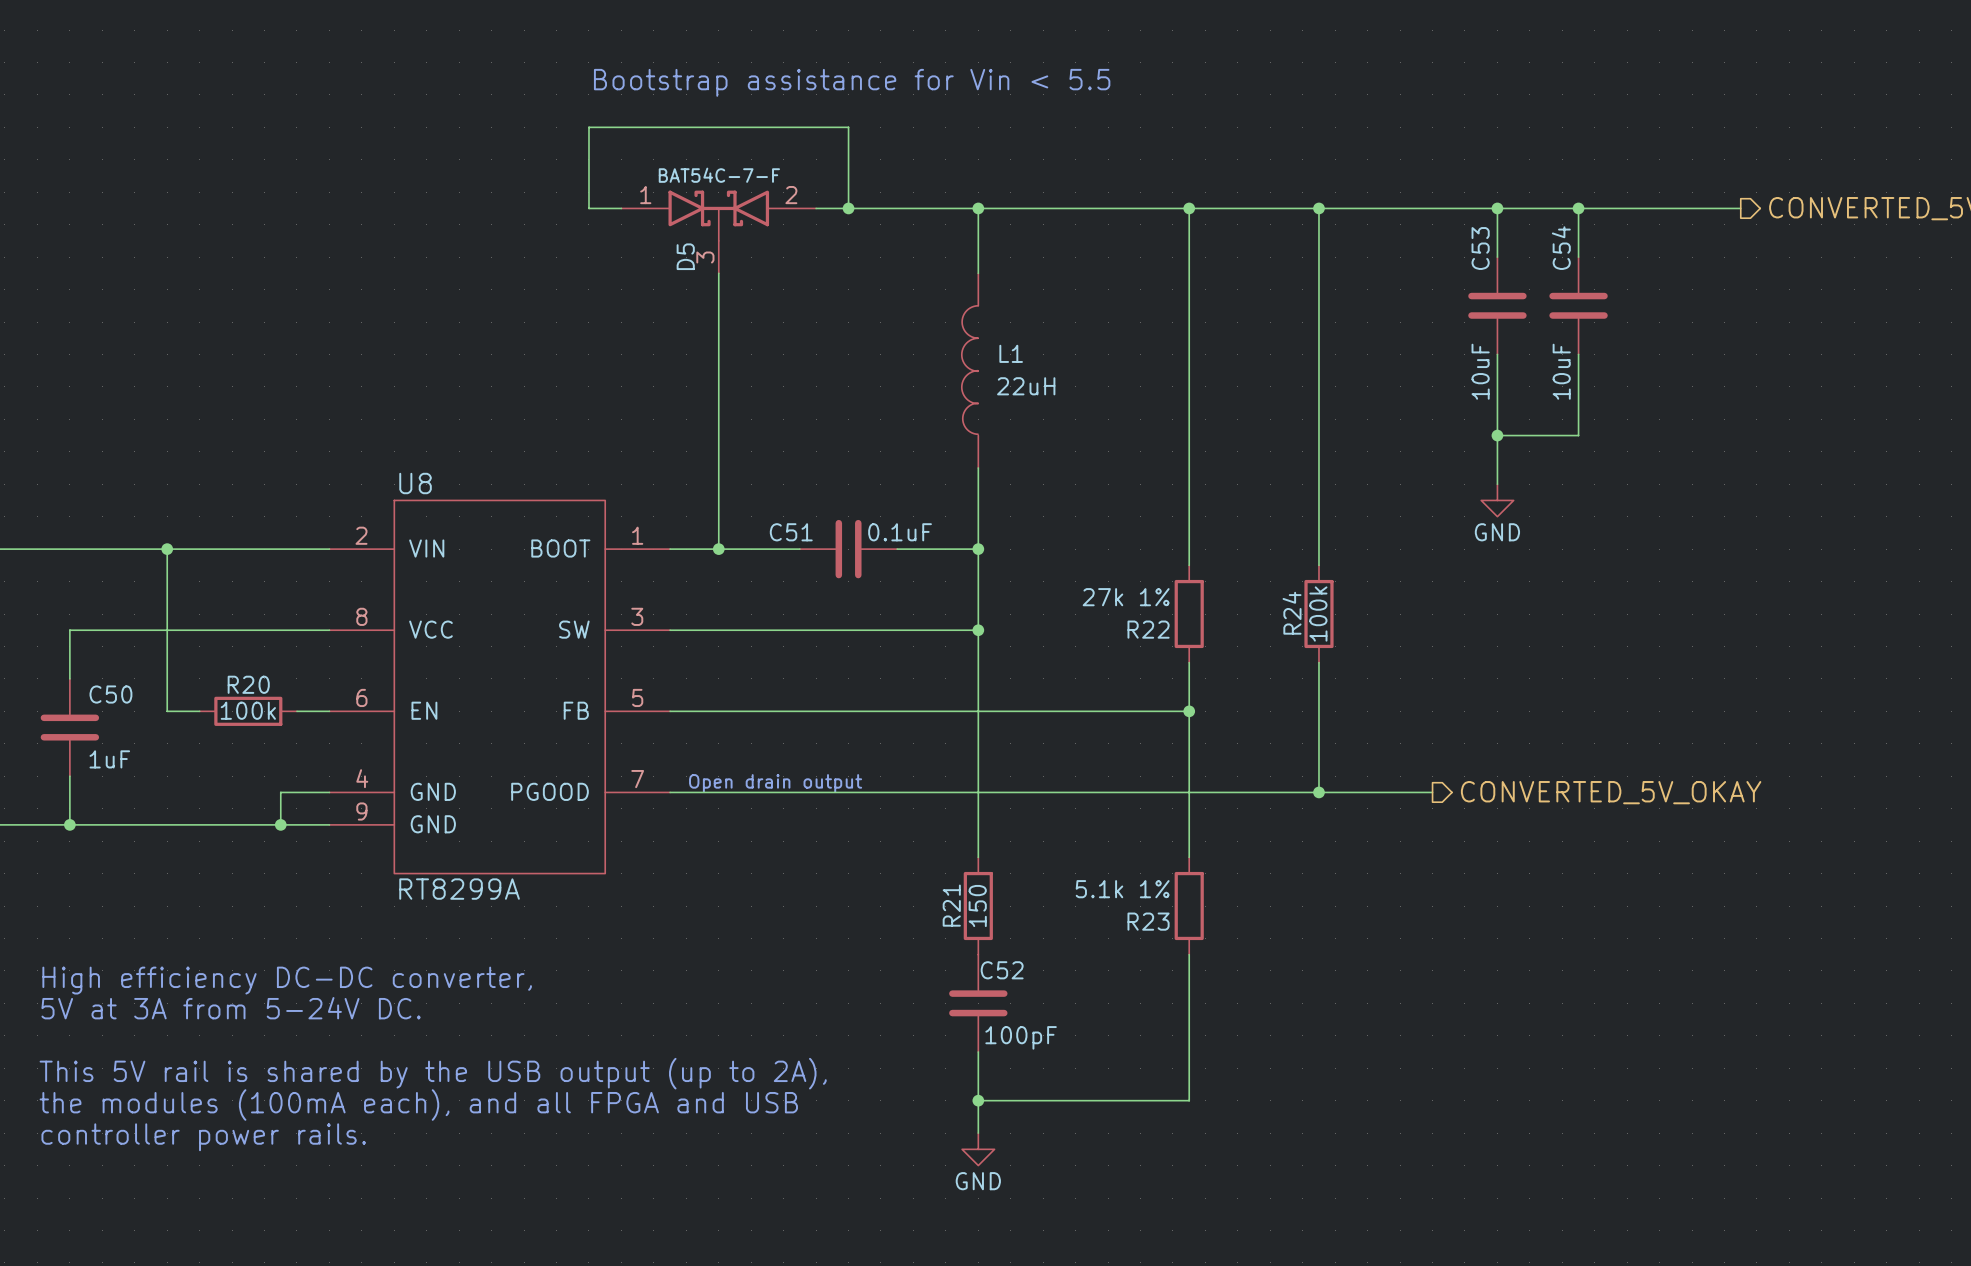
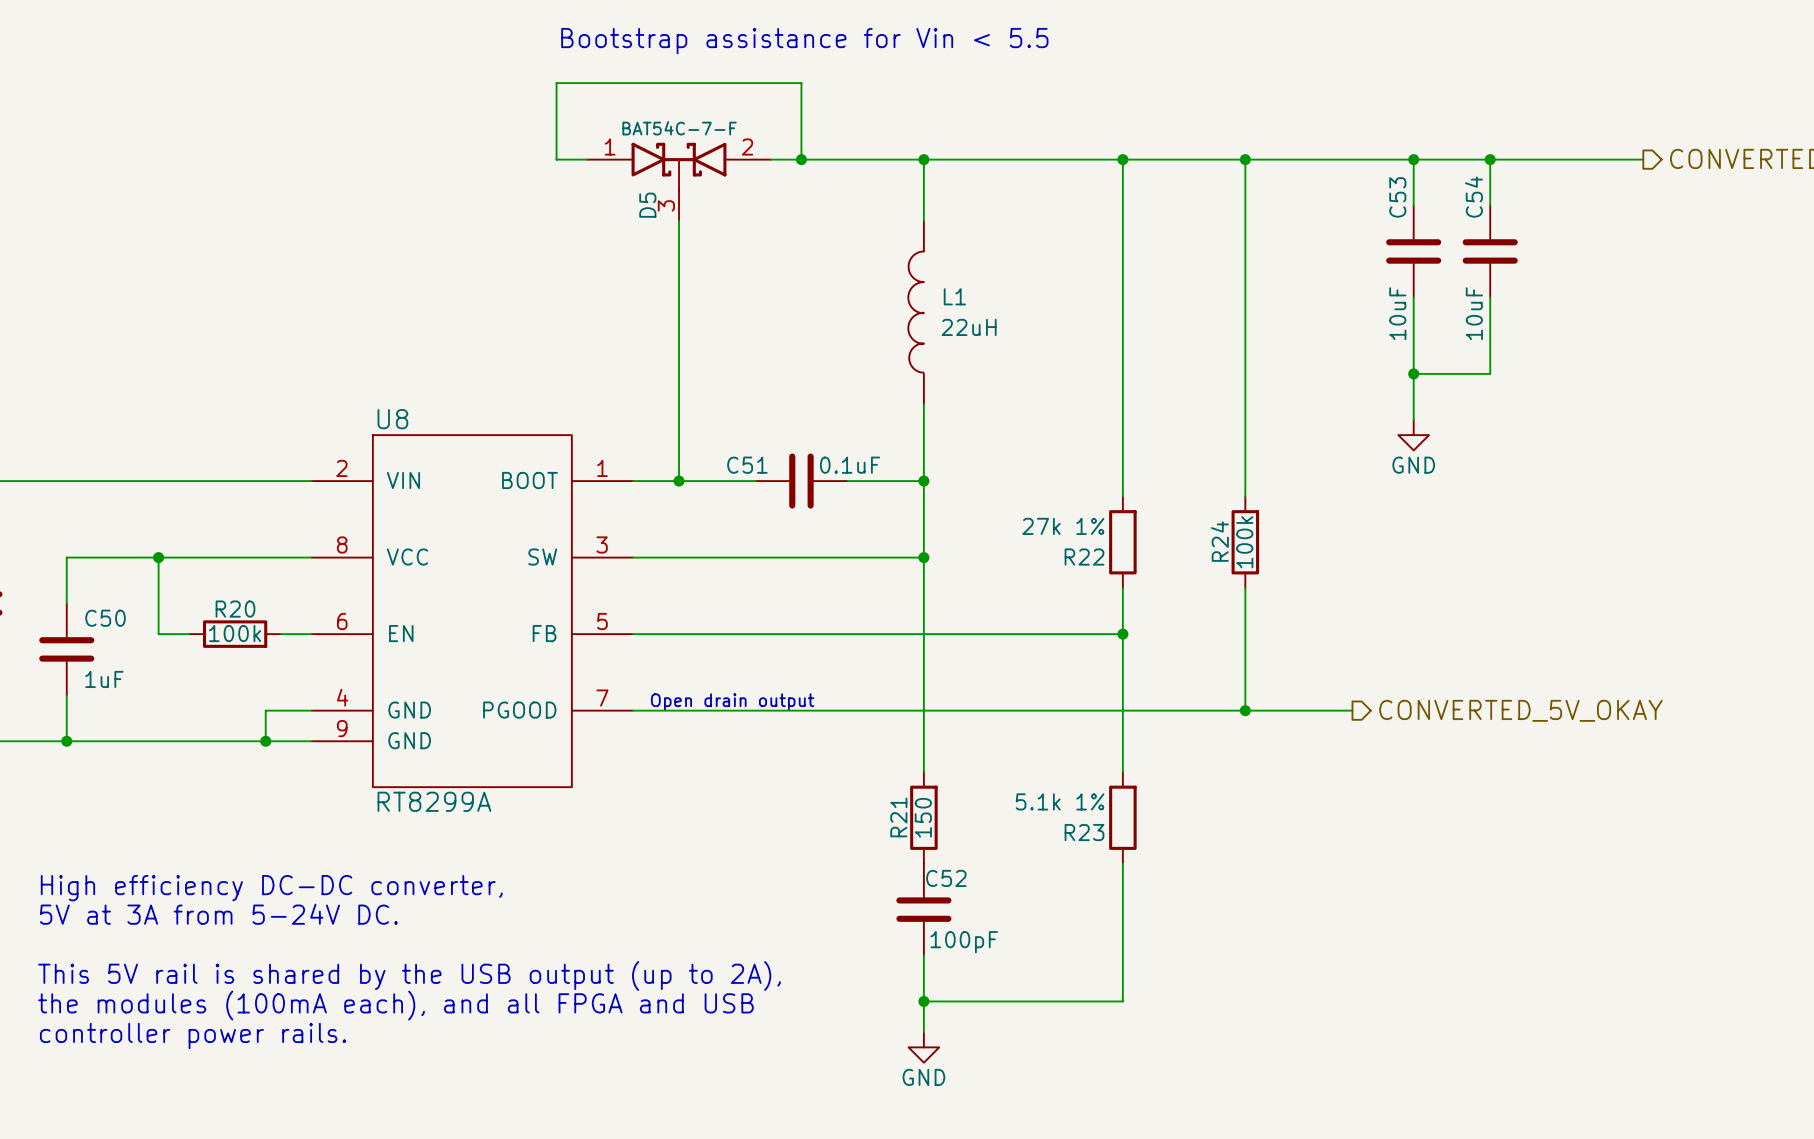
wire: (167, 549) (167, 630) -> none
junction: (167, 549) -> none
junction: none -> (158, 557)

